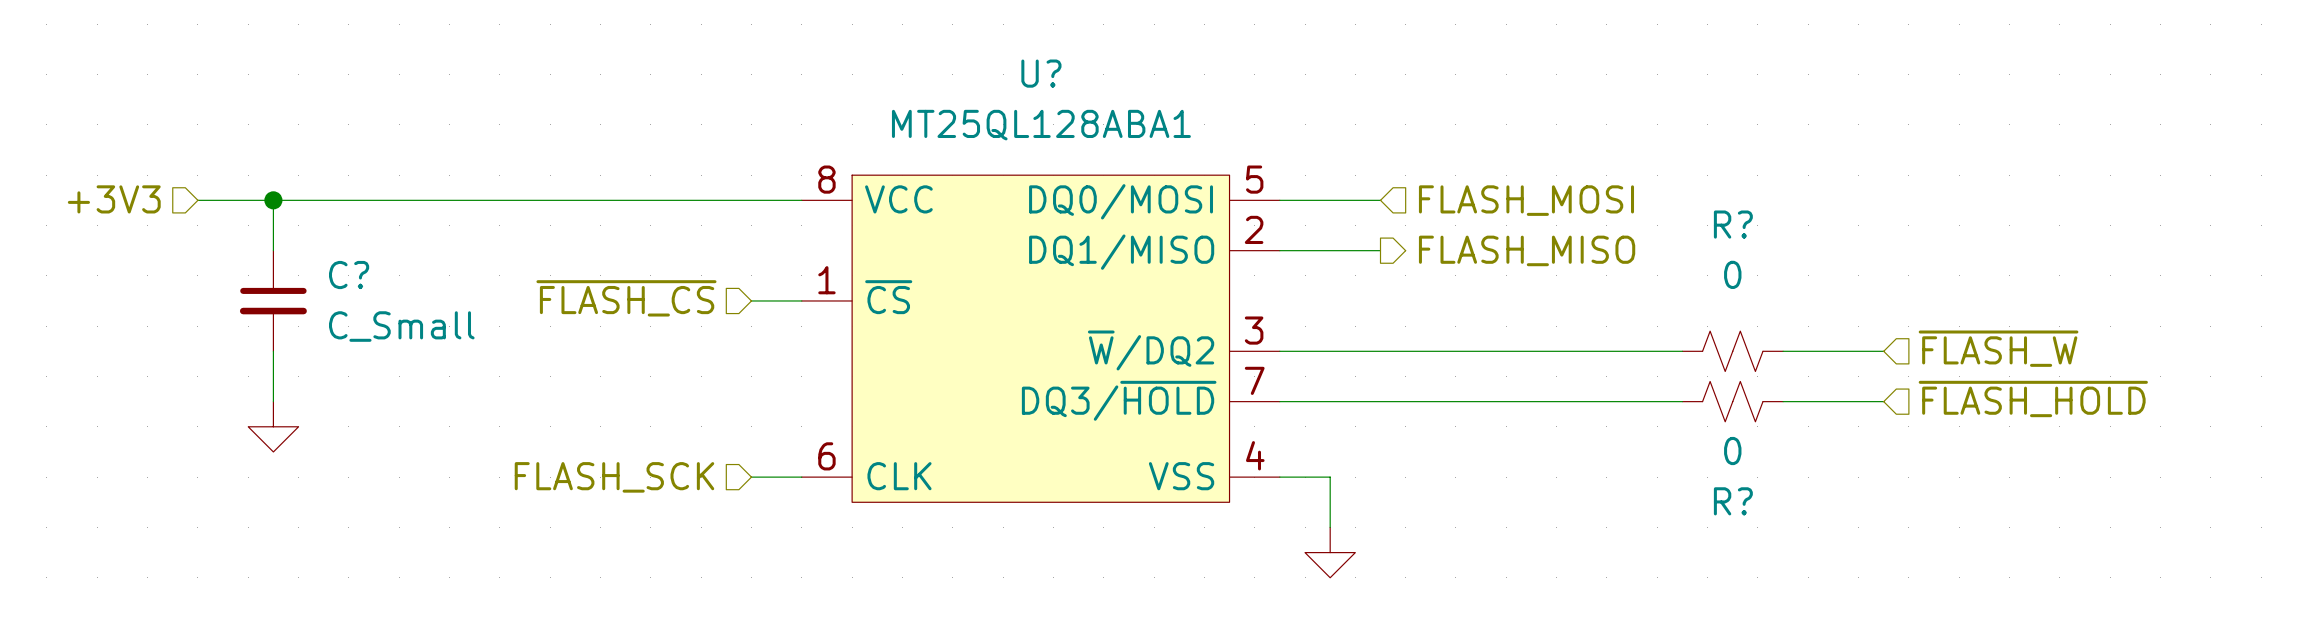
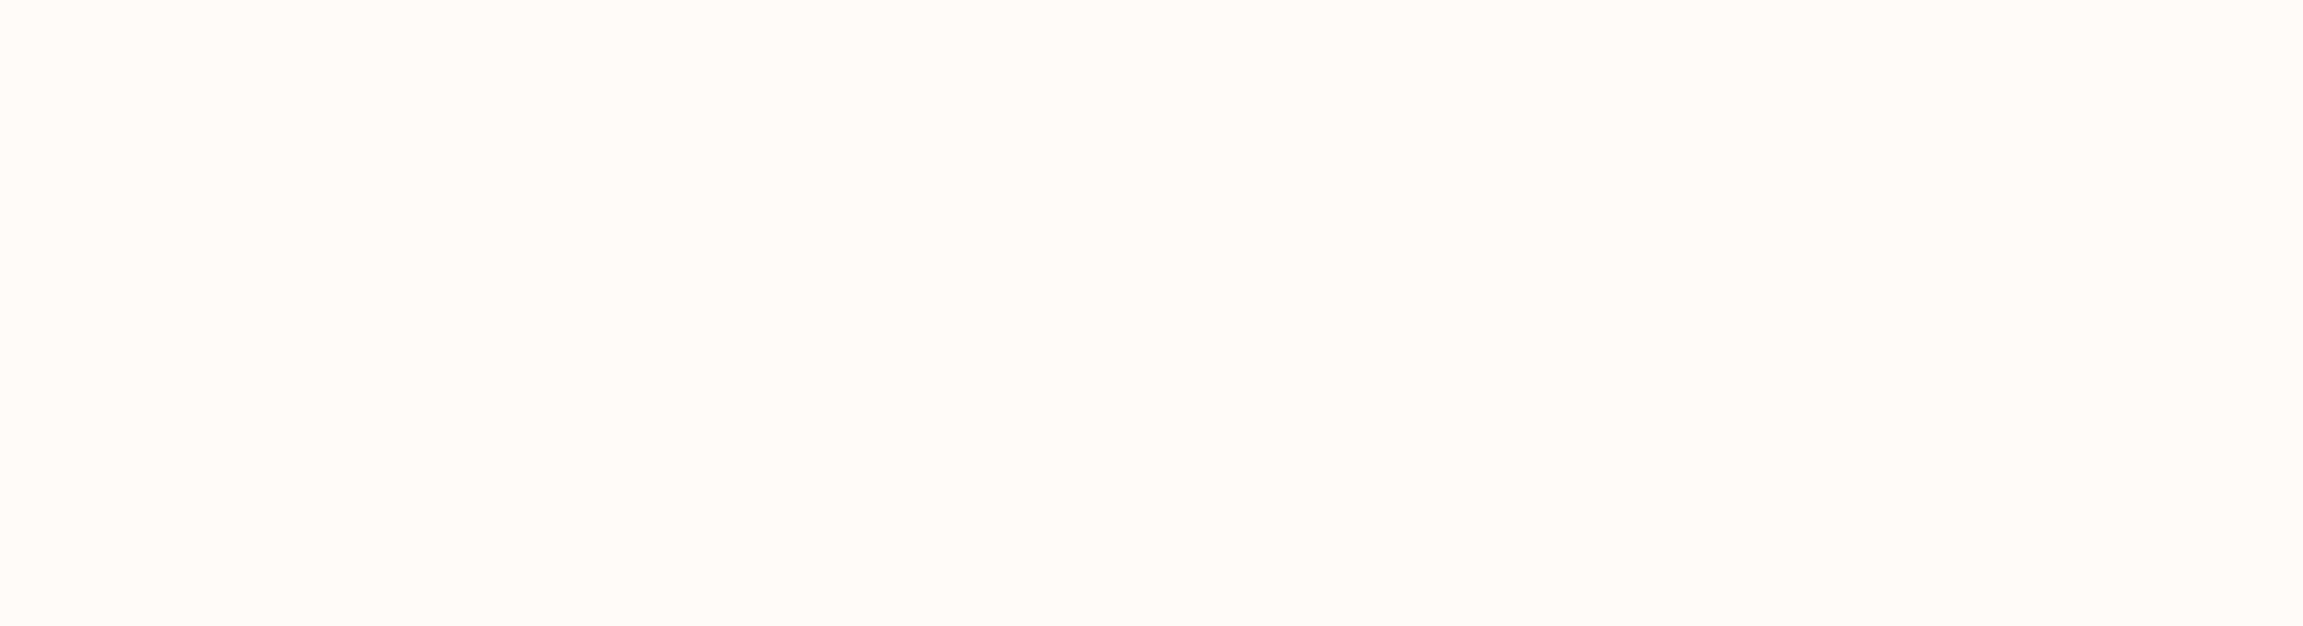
hierarchical label: +3V3 (114, 199) -> none
wire: (197, 200) (801, 200) -> none
wire: (273, 200) (273, 250) -> none
junction: (273, 200) -> none
wire: (1279, 200) (1380, 200) -> none
hierarchical label: FLASH_MOSI (1526, 200) -> none
wire: (1279, 250) (1380, 250) -> none
hierarchical label: FLASH_MISO (1527, 250) -> none
hierarchical label: ~{FLASH_CS} (626, 298) -> none
C?: C_Small (273, 300) -> none
wire: (751, 300) (801, 300) -> none
U?: MT25QL128ABA1 (1040, 338) -> none
hierarchical label: ~{FLASH_W} (1998, 348) -> none
wire: (273, 351) (273, 401) -> none
wire: (1279, 351) (1682, 351) -> none
R?: 0 (1732, 351) -> none
wire: (1783, 351) (1883, 351) -> none
hierarchical label: ~{FLASH_HOLD} (2033, 398) -> none
wire: (1279, 401) (1682, 401) -> none
R?: 0 (1732, 401) -> none
wire: (1783, 401) (1883, 401) -> none
power symbol: (273, 426) -> none
hierarchical label: FLASH_SCK (614, 477) -> none
wire: (751, 477) (801, 477) -> none
wire: (1279, 477) (1330, 477) (1330, 527) -> none
power symbol: (1330, 552) -> none

